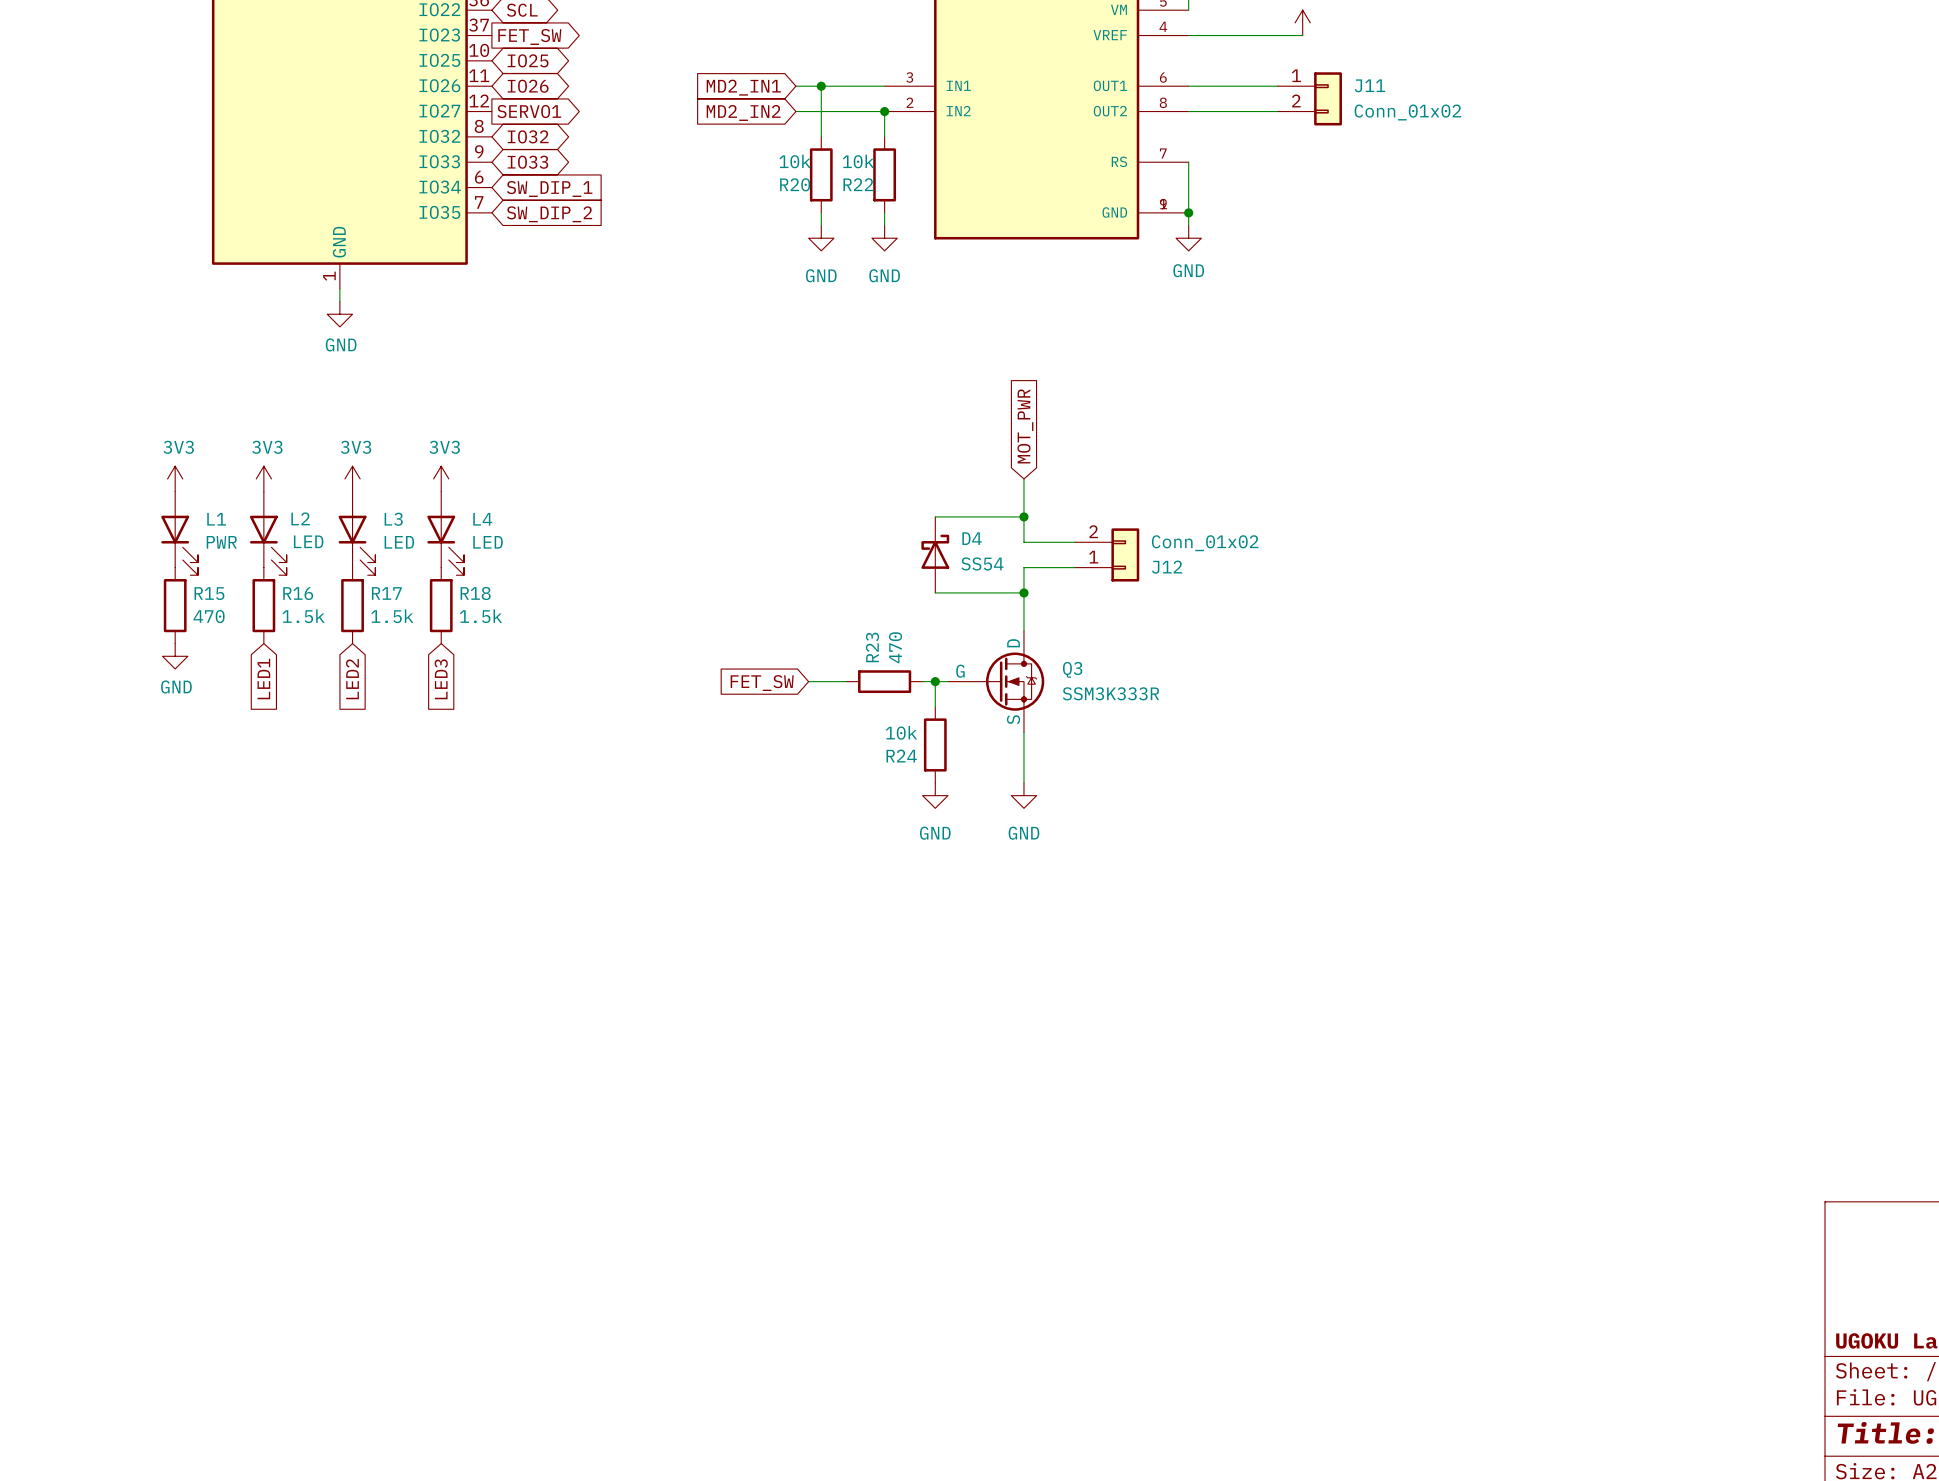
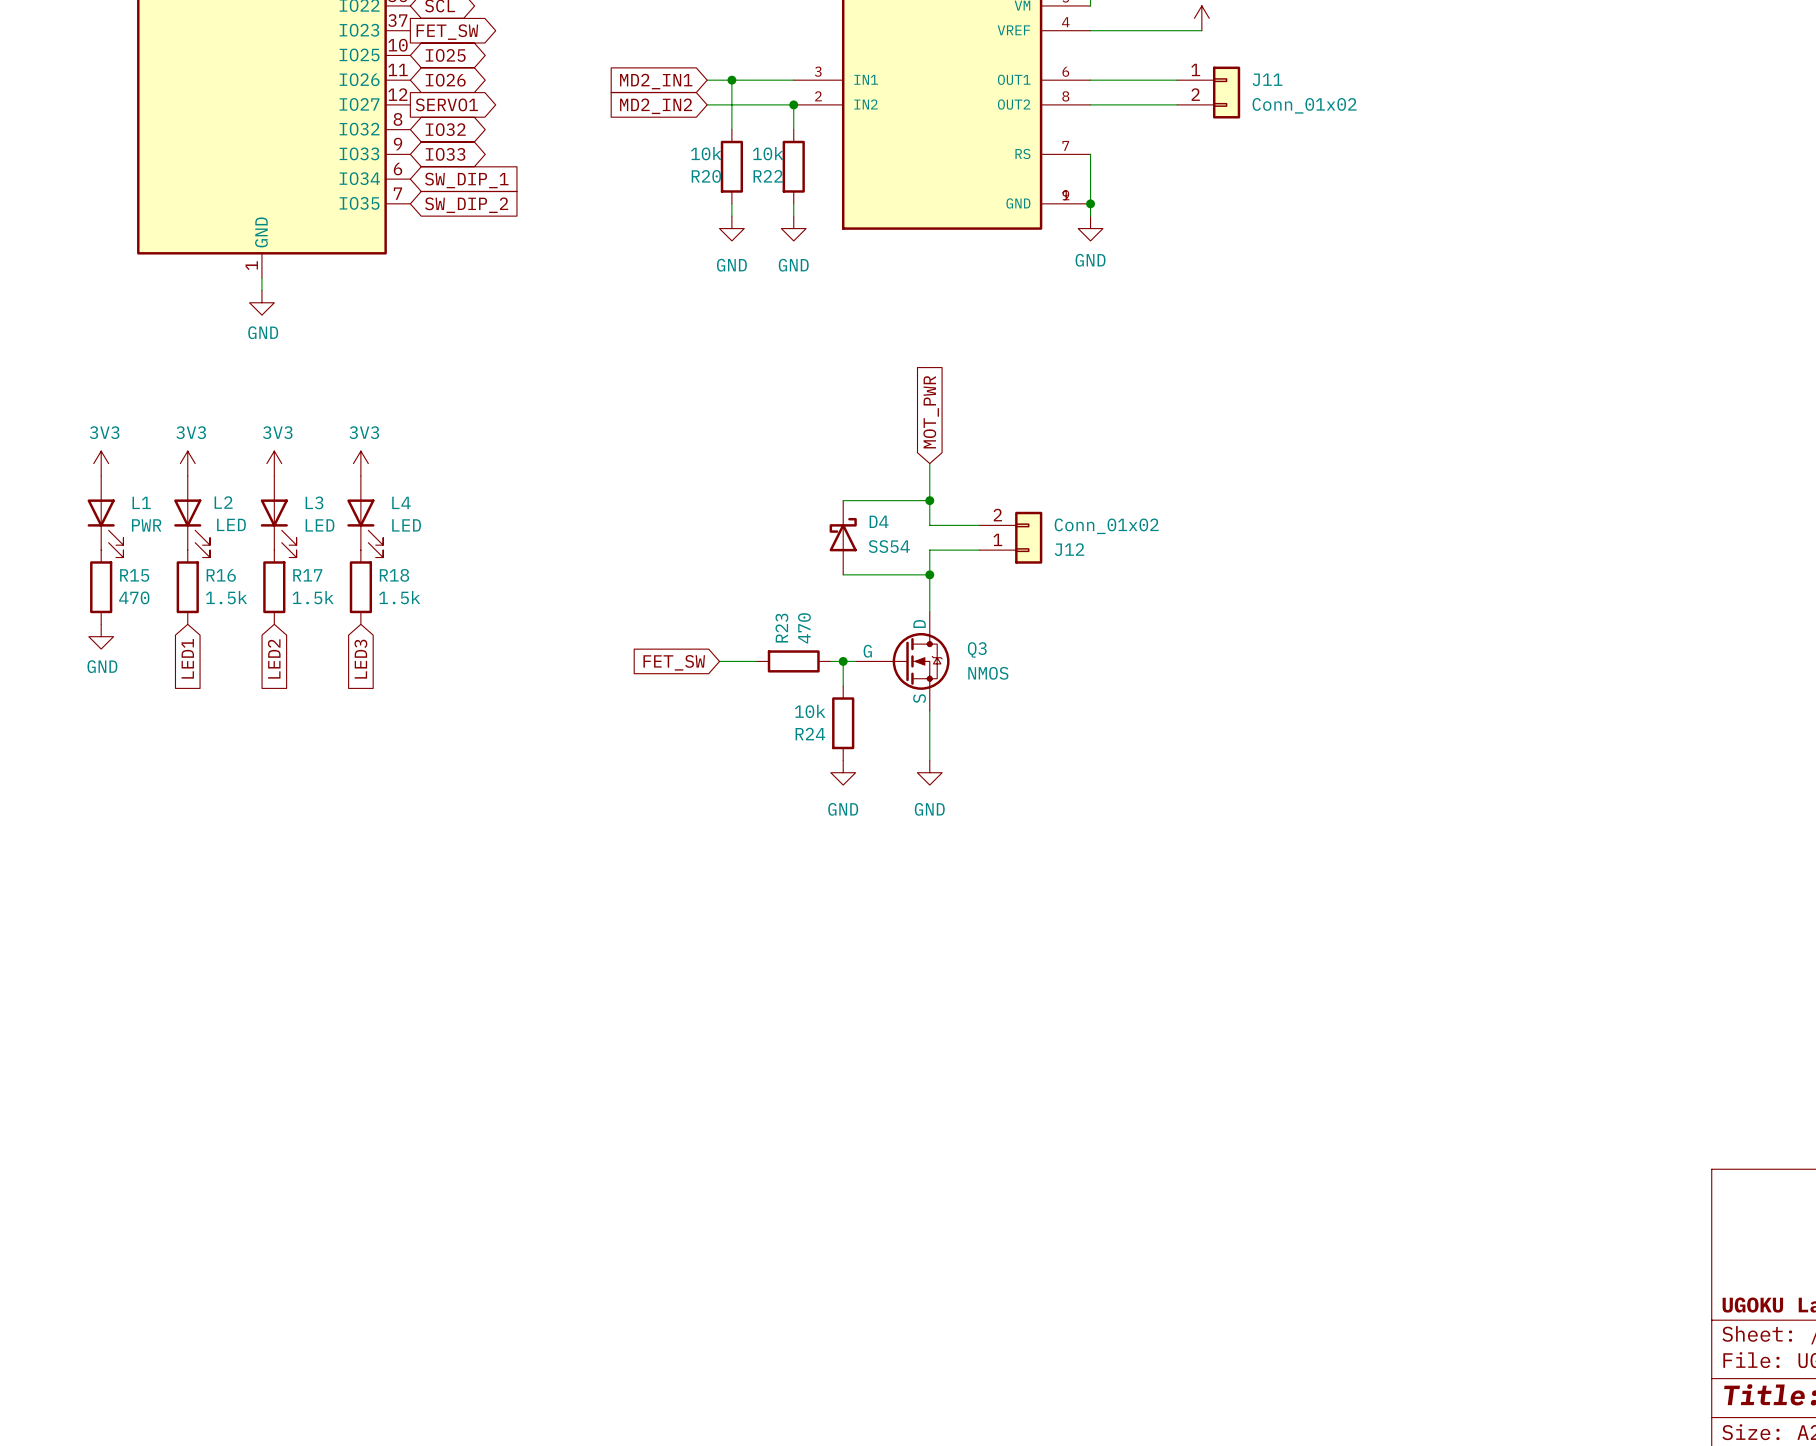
Q3 value: SSM3K333R (1110, 693) -> NMOS (988, 673)

